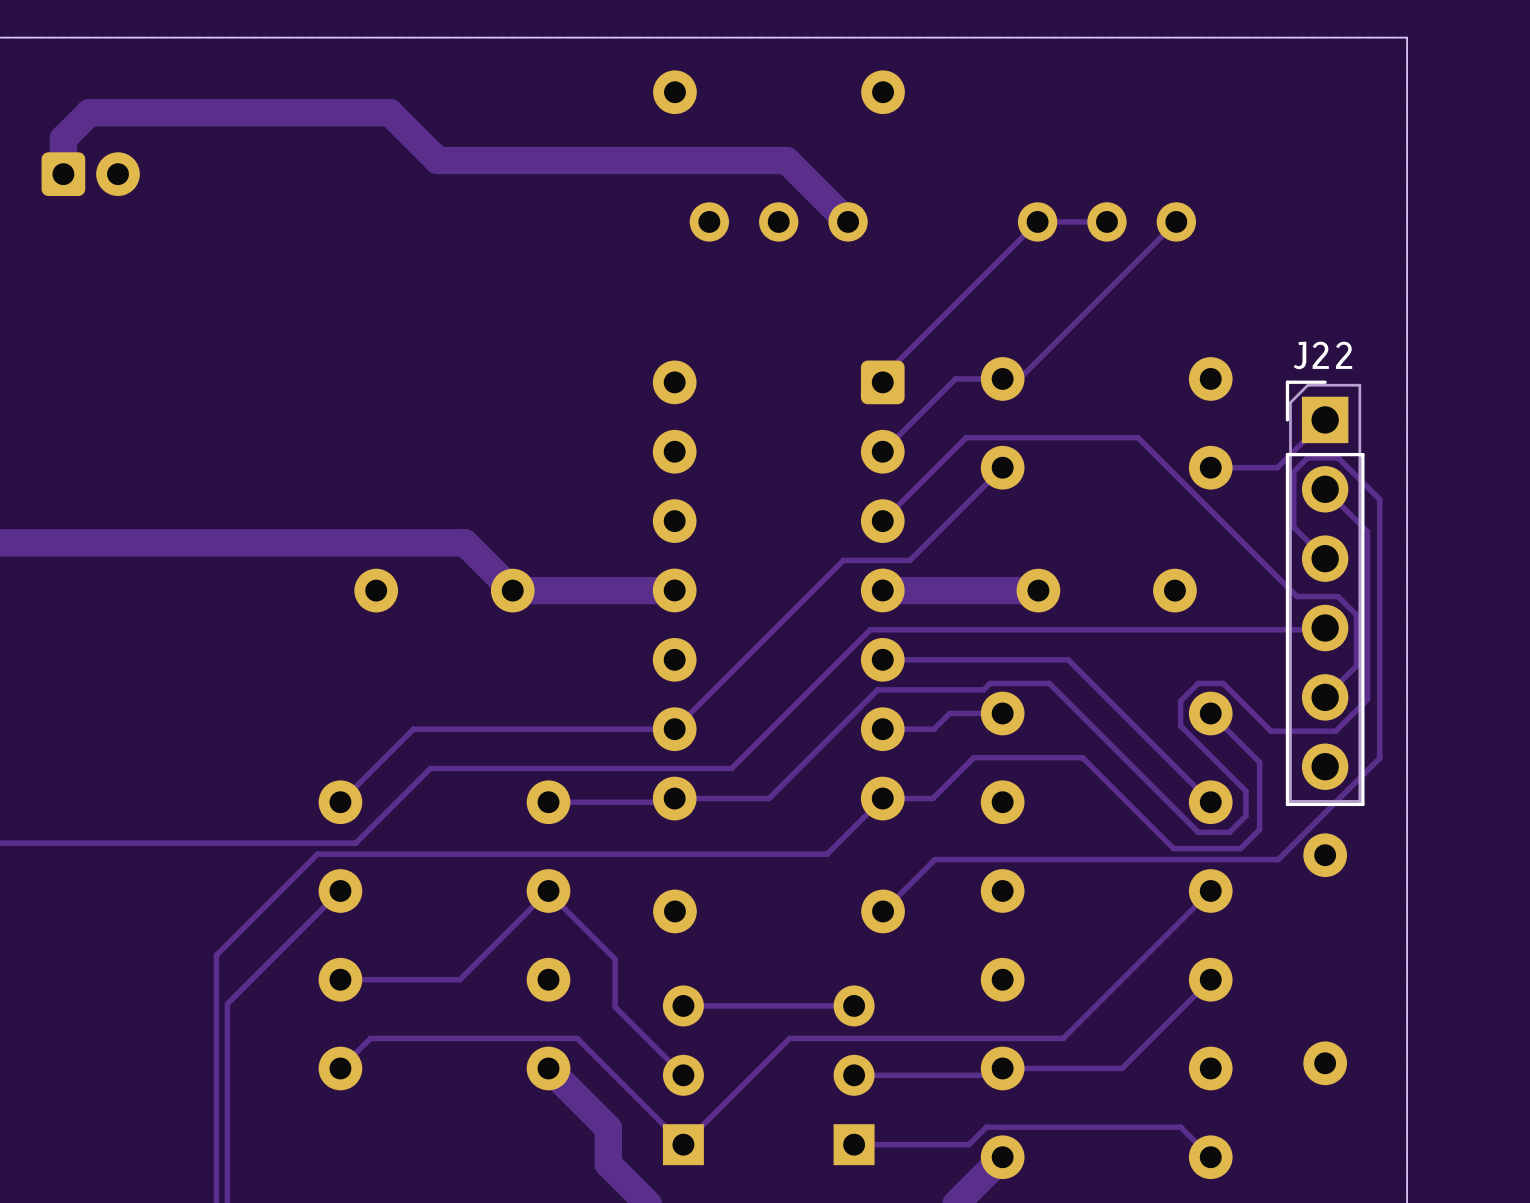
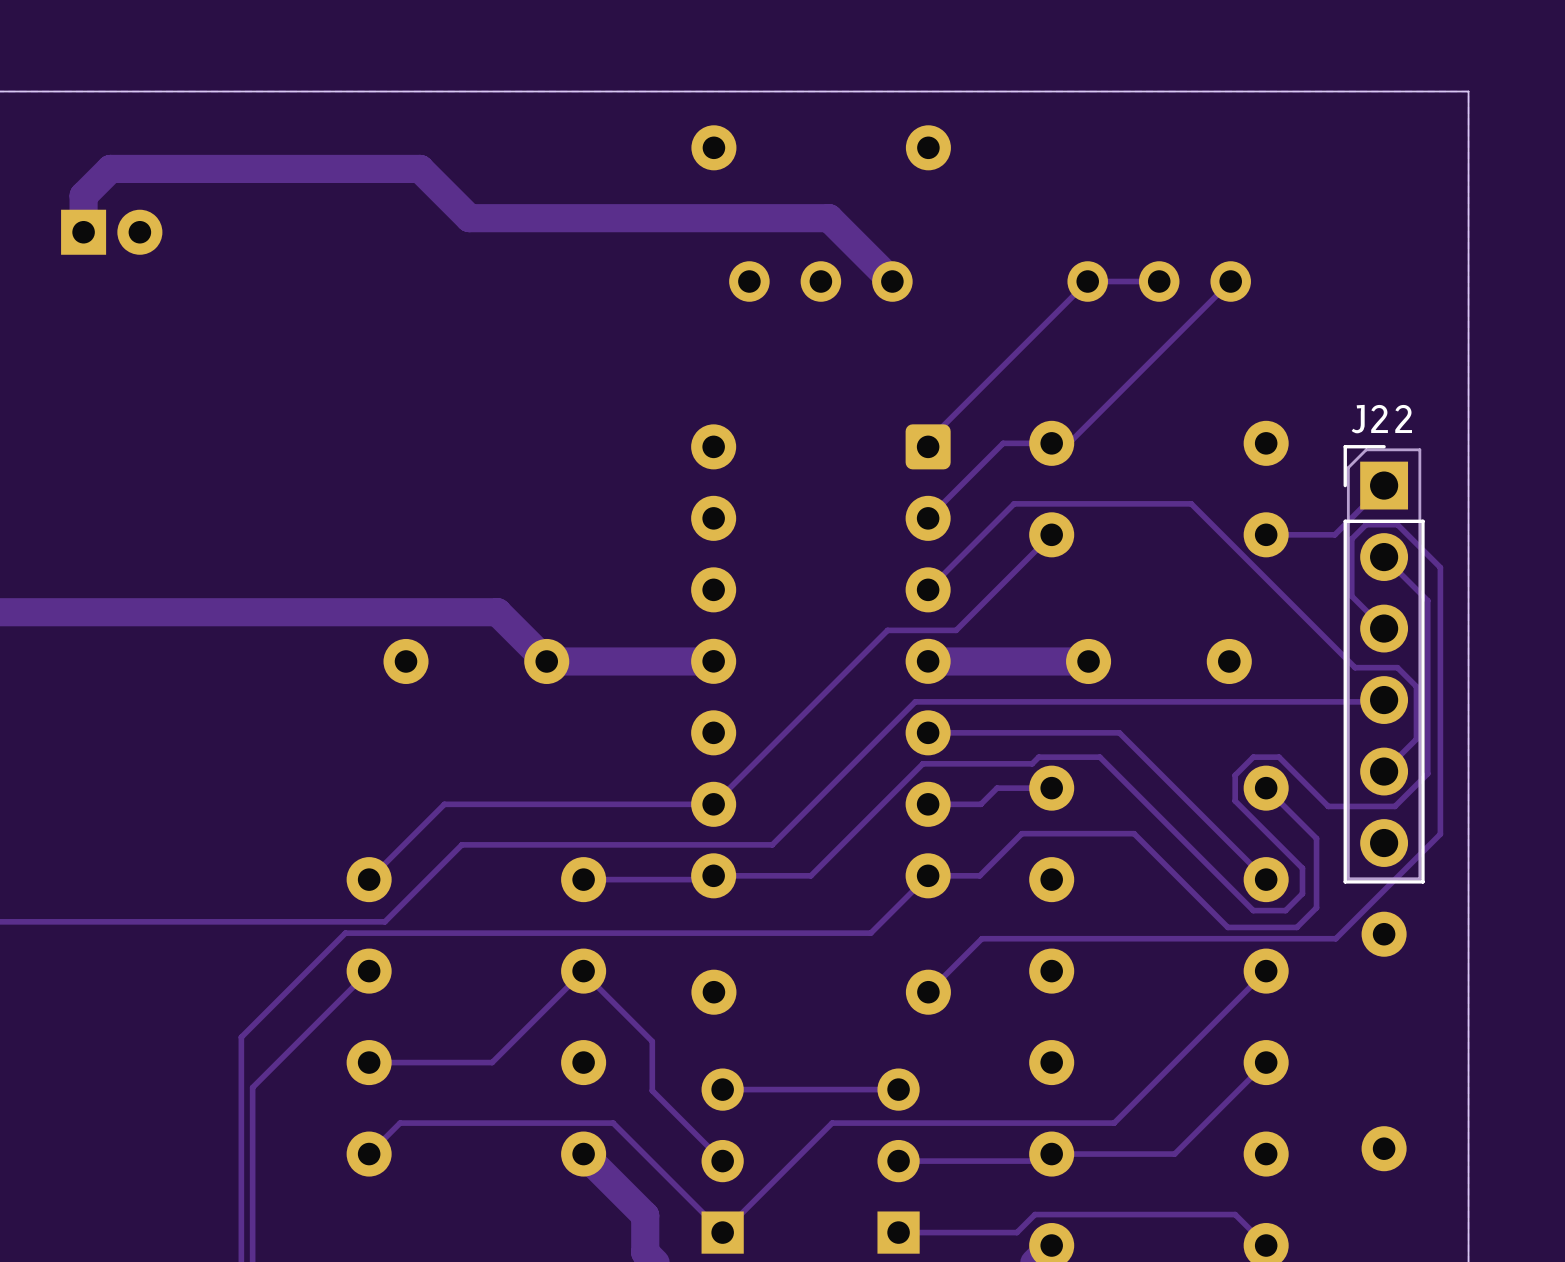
part footprint: [41, 152, 140, 196] -> [61, 209, 163, 255]

